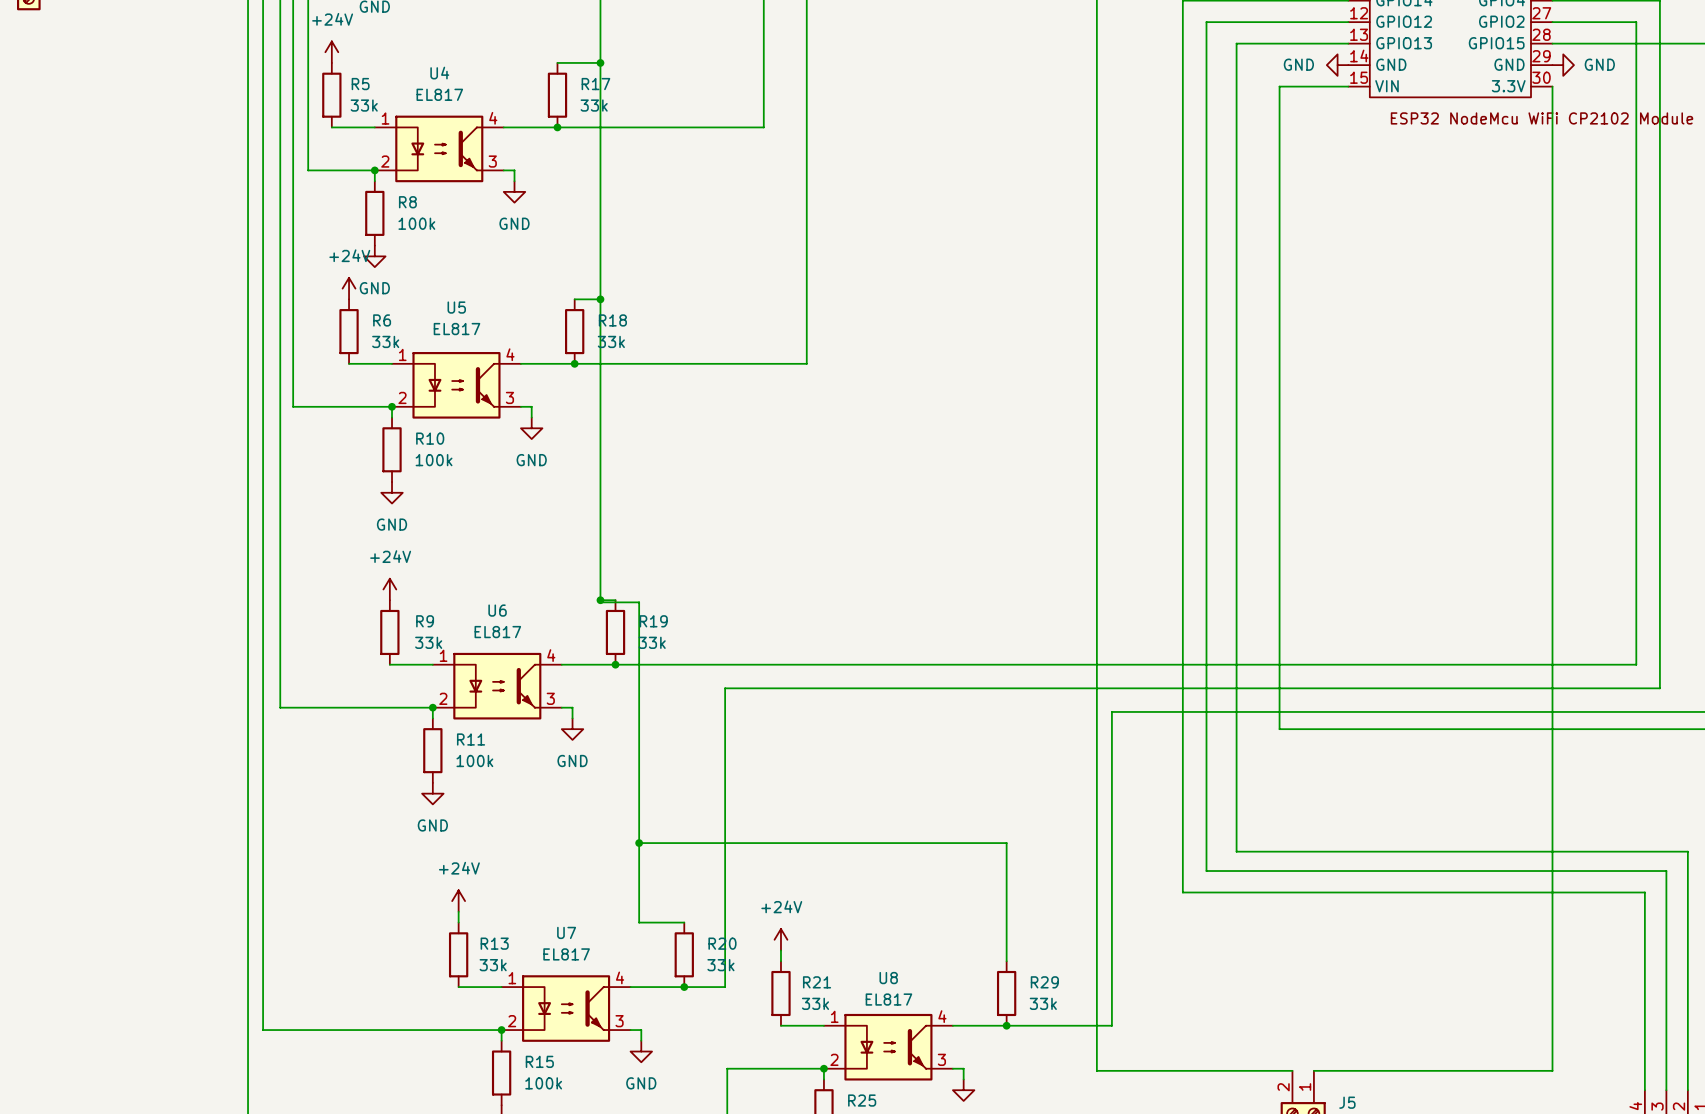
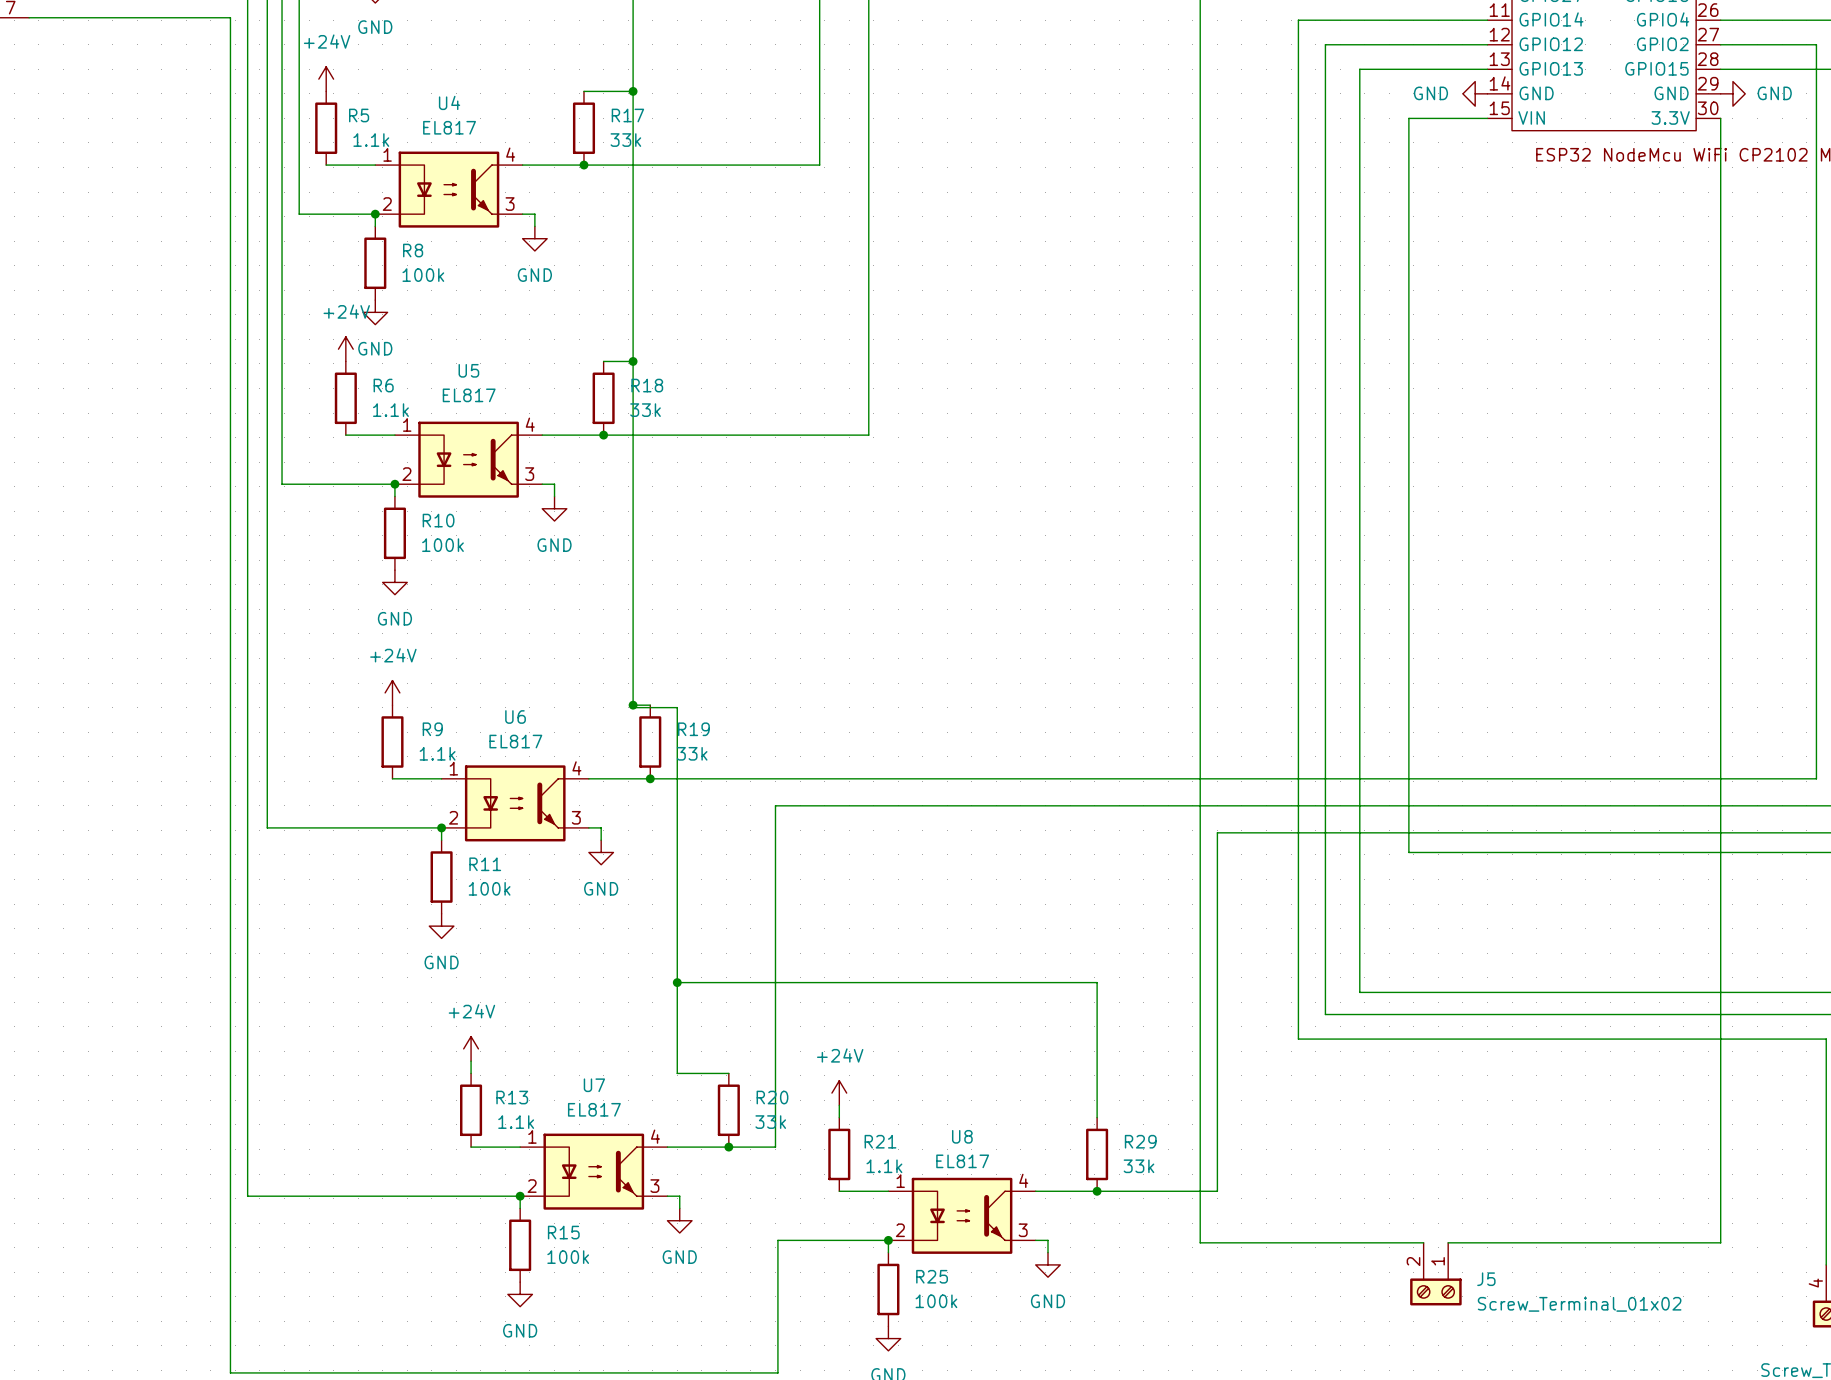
R5 value: 33k (364, 105) -> 1.1k (371, 140)
R6 value: 33k (385, 341) -> 1.1k (390, 410)
R9 value: 33k (428, 642) -> 1.1k (437, 753)
R13 value: 33k (493, 965) -> 1.1k (516, 1122)
R21 value: 33k (815, 1003) -> 1.1k (884, 1166)

